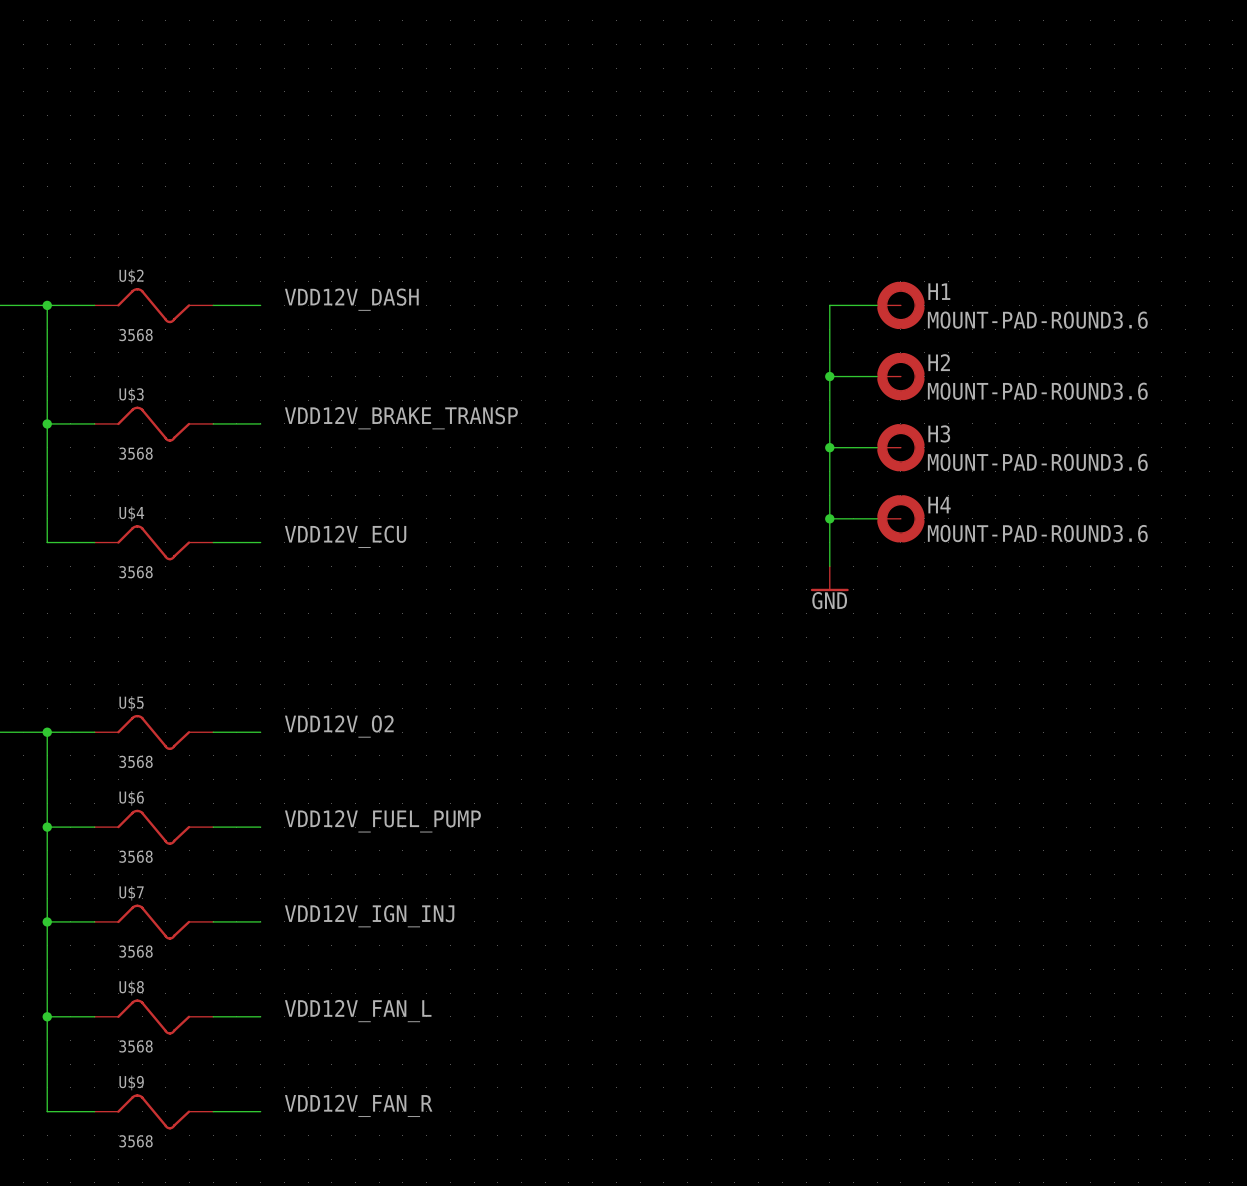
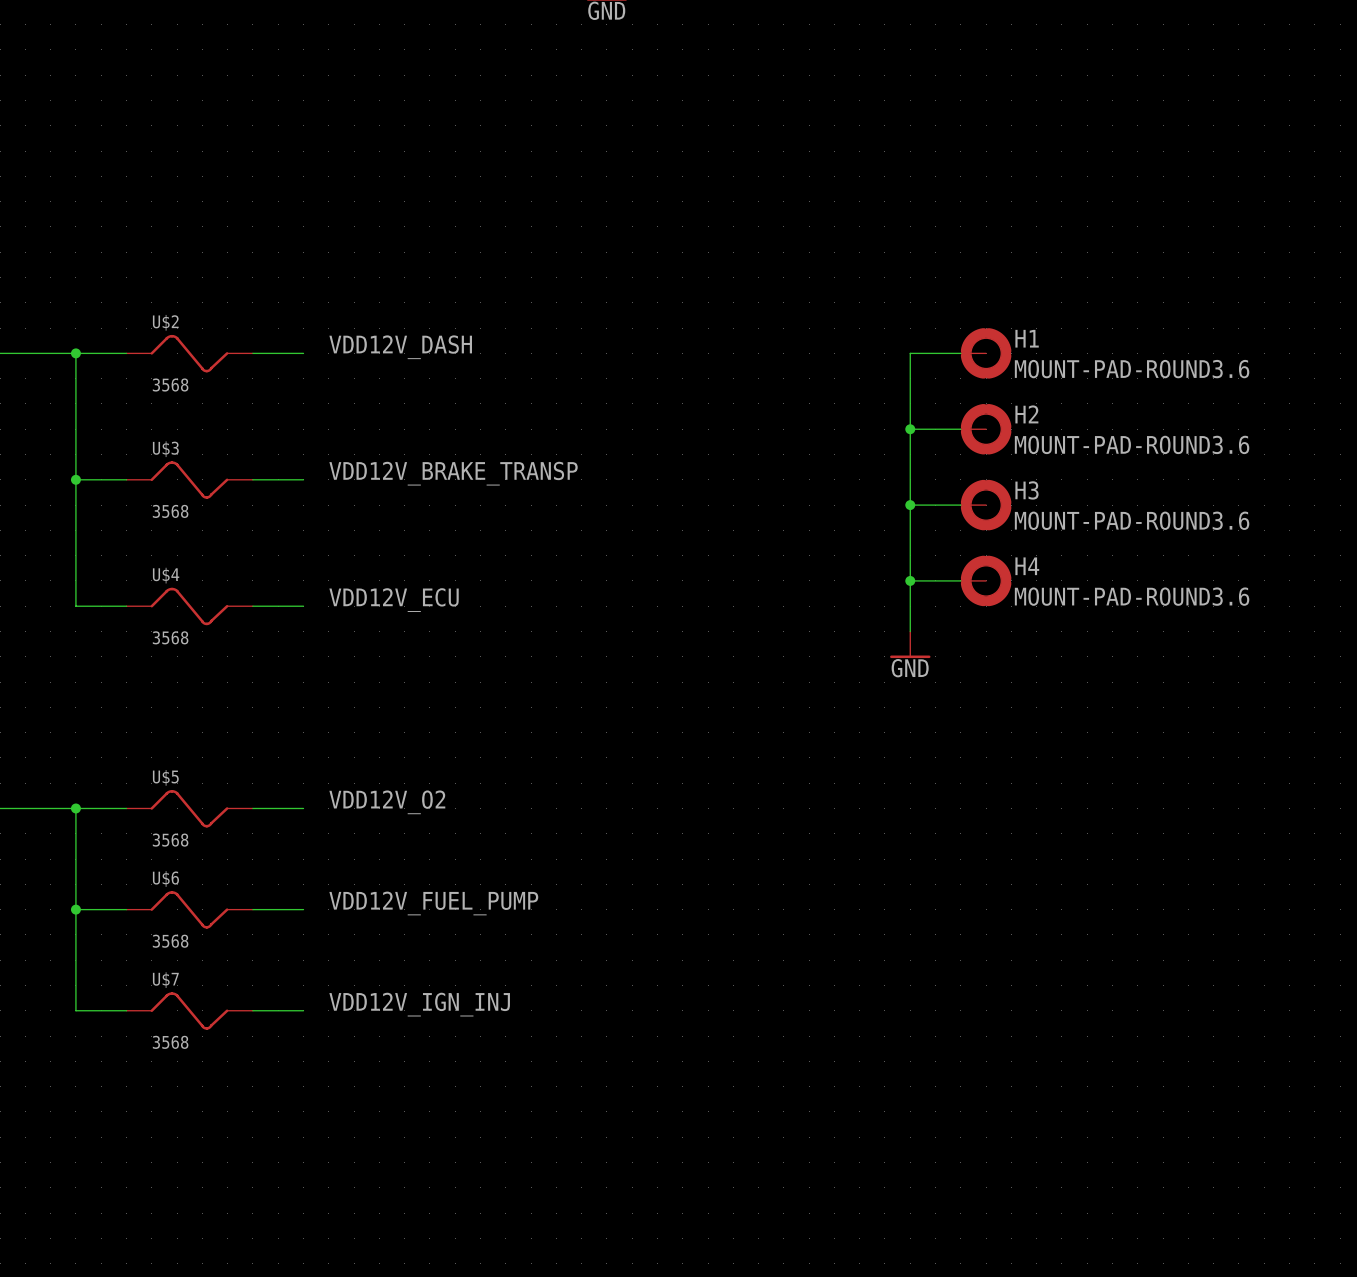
wire: (47, 921) (47, 1111) (94, 1111) -> none
junction: (47, 921) -> none
label: VDD12V_FAN_L (358, 1011) -> none
wire: (47, 1016) (94, 1016) -> none
junction: (47, 1016) -> none
wire: (213, 1016) (260, 1016) -> none
U$8: 3568 (153, 1017) -> none
label: VDD12V_FAN_R (358, 1105) -> none
U$9: 3568 (153, 1111) -> none
wire: (213, 1111) (260, 1111) -> none

